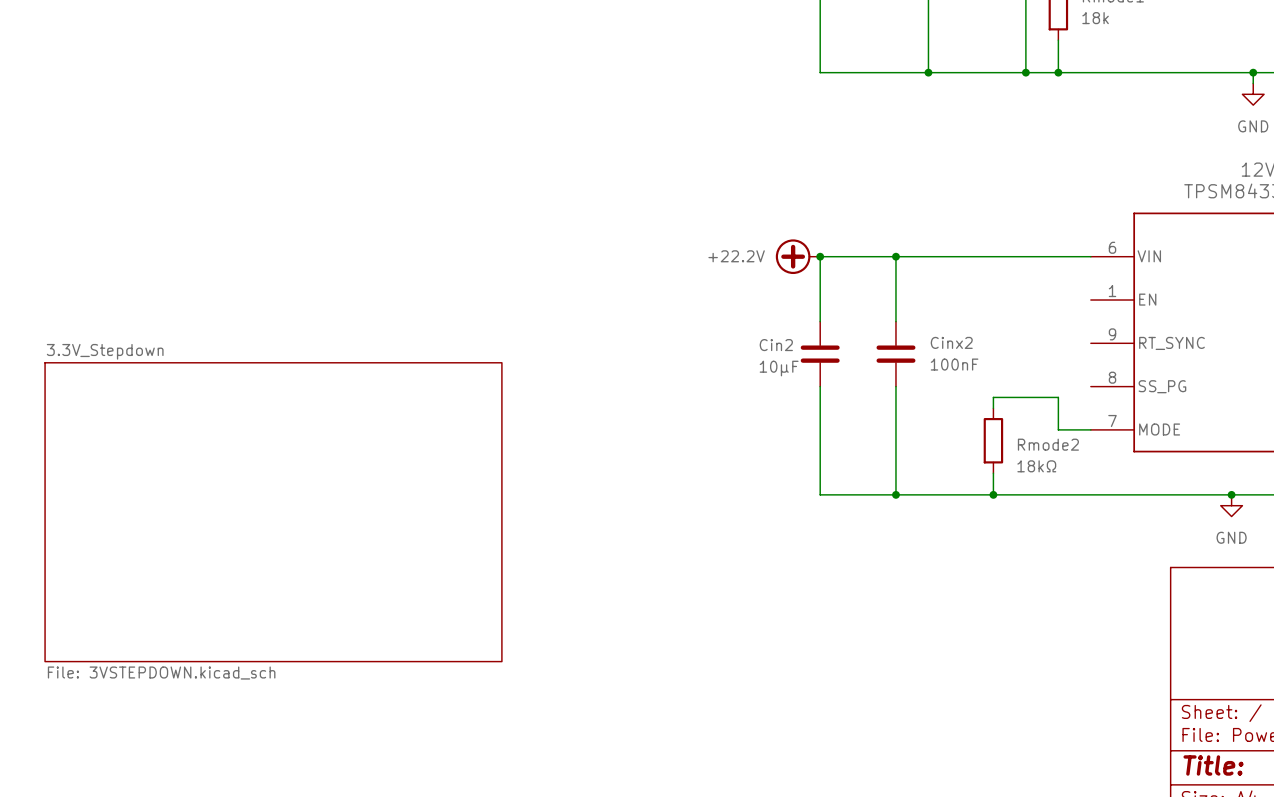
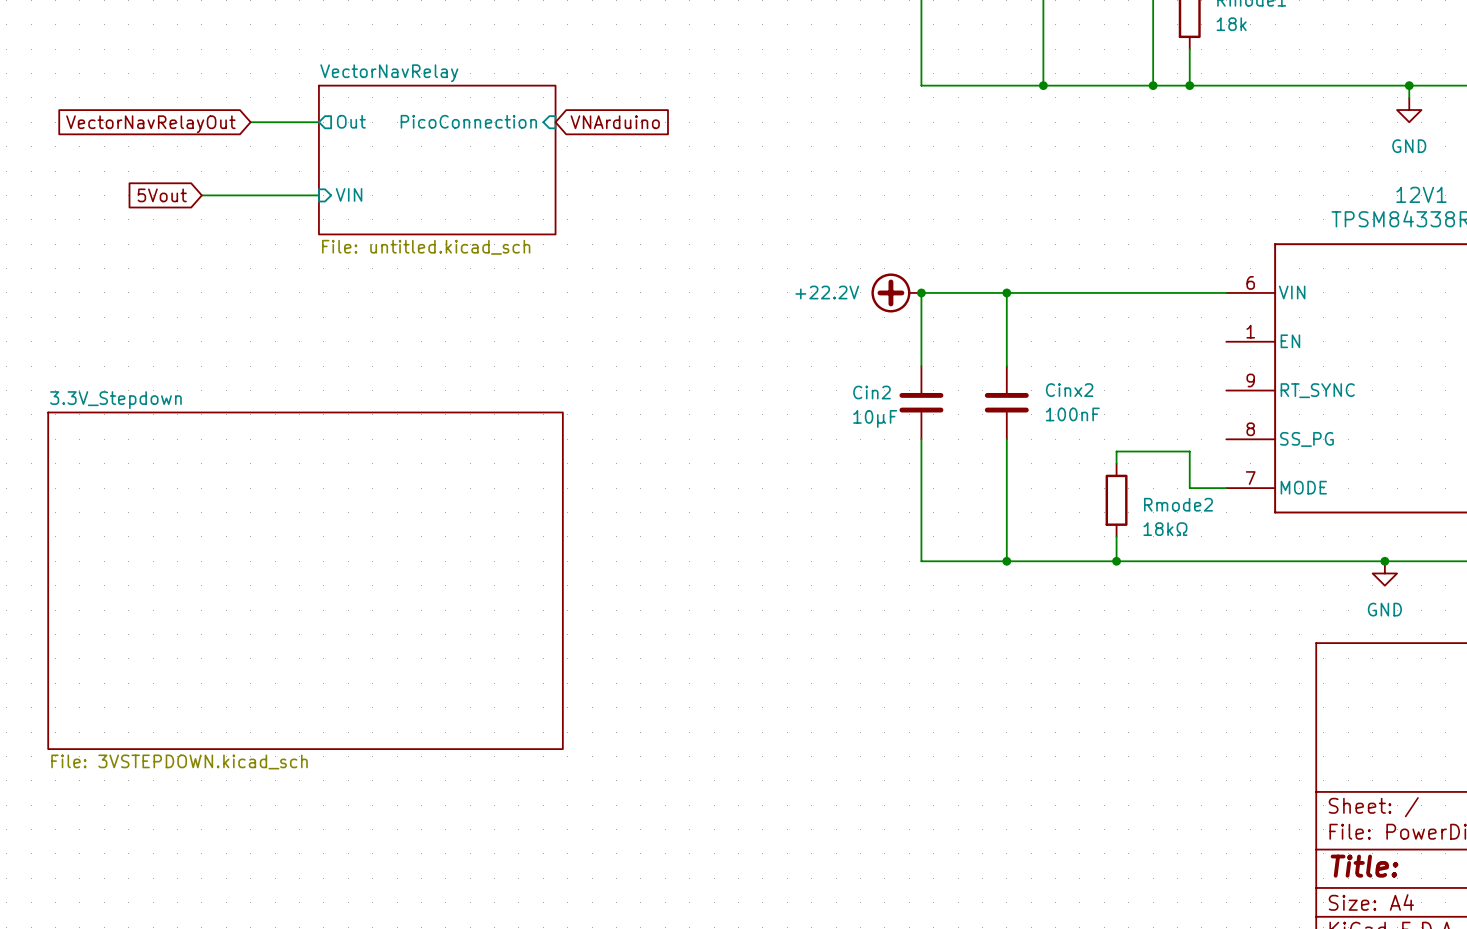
sheet pin: none -> Out (351, 121)
sheet pin: none -> PicoConnection (468, 121)
wire: none -> (250, 122) (318, 122)
global label: none -> VNArduino (615, 122)
global label: none -> VectorNavRelayOut (150, 124)
sheet VectorNavRelay: none -> File: untitled.kicad_sch (437, 160)
sheet pin: none -> VIN (349, 194)
global label: none -> 5Vout (162, 195)
wire: none -> (201, 195) (318, 195)

